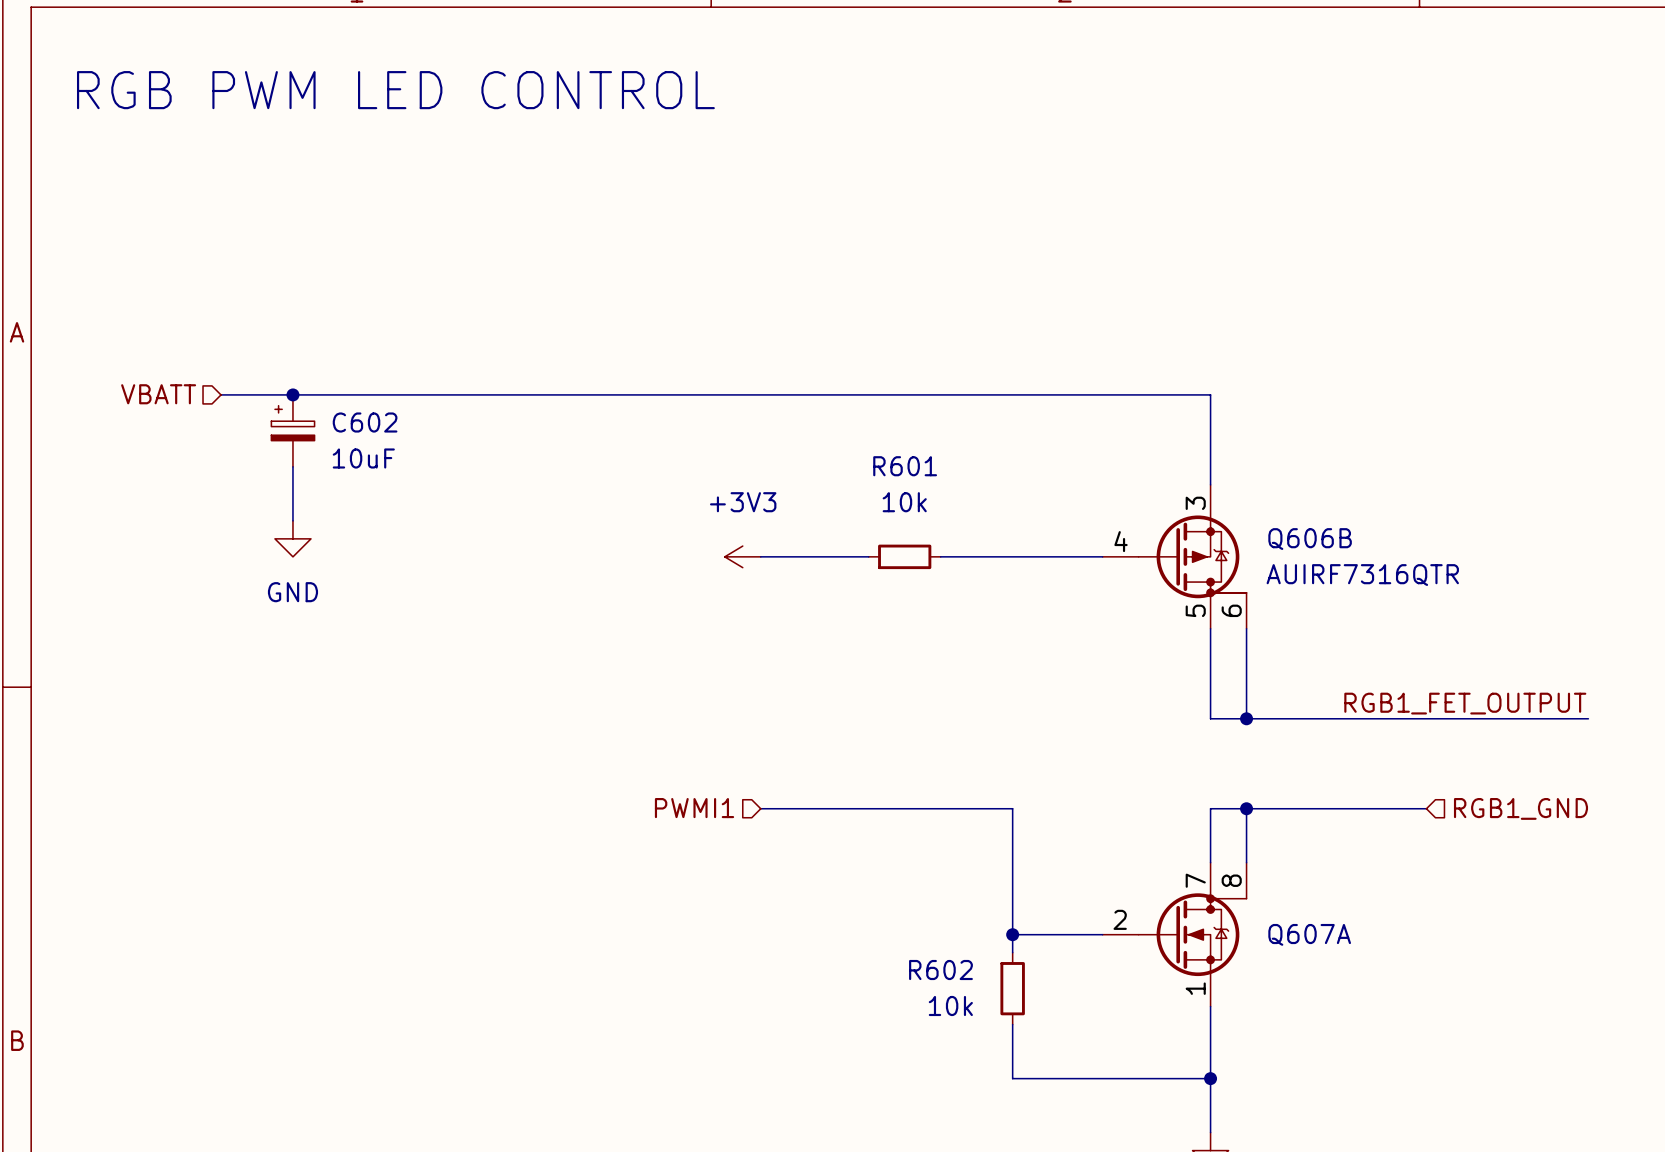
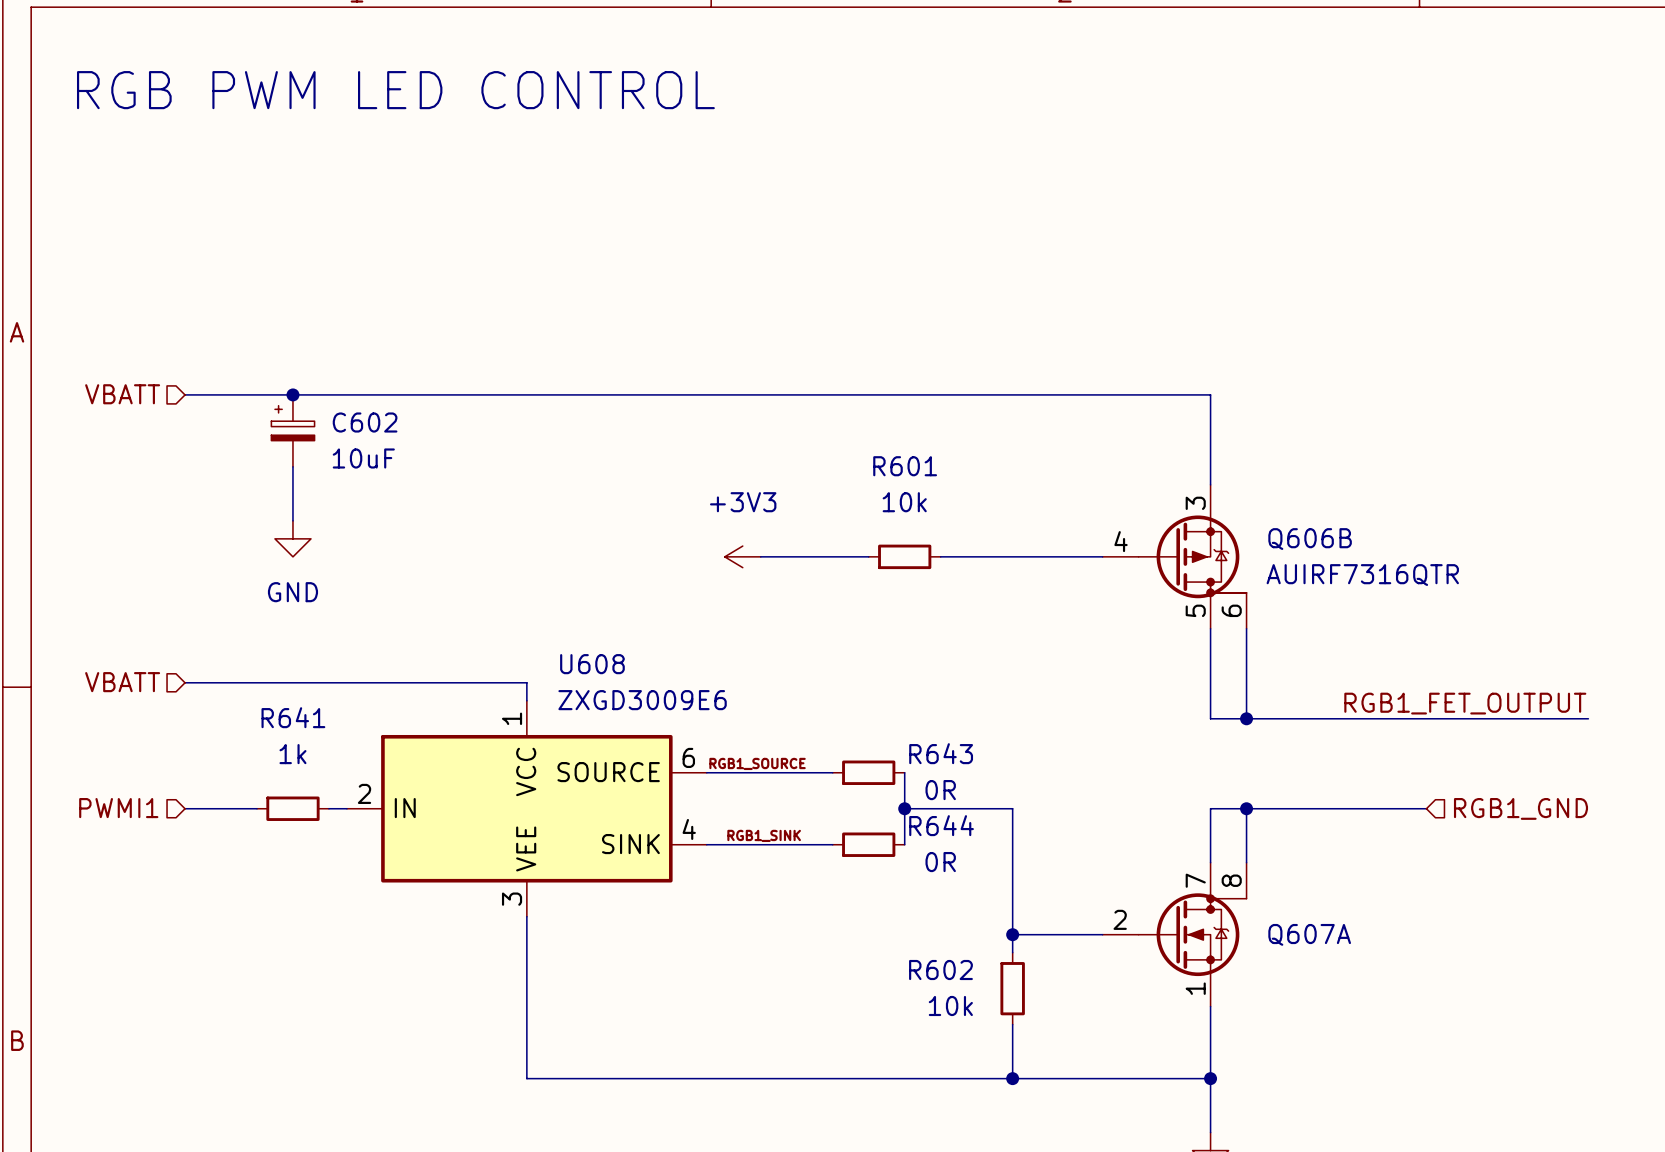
hierarchical label position: VBATT (158, 394) -> VBATT (122, 394)
wire: none -> (185, 394) (221, 394)
hierarchical label: none -> VBATT (122, 682)
wire: none -> (185, 682) (526, 682) (526, 700)
label: none -> RGB1_SOURCE (757, 763)
wire: none -> (706, 772) (832, 772)
R643: none -> 0R (868, 772)
wire: none -> (904, 772) (904, 844)
hierarchical label: none -> PWMI1 (118, 808)
wire: none -> (185, 808) (256, 808)
R641: none -> 1k (292, 808)
wire: none -> (328, 808) (346, 808)
U608: none -> ZXGD3009E6 (526, 808)
hierarchical label: PWMI1 (694, 808) -> none
wire: (760, 808) (904, 808) -> none
junction: none -> (904, 808)
label: none -> RGB1_SINK (764, 835)
wire: none -> (706, 844) (832, 844)
R644: none -> 0R (868, 844)
wire: none -> (526, 916) (526, 1078) (1012, 1078)
junction: none -> (1012, 1078)

